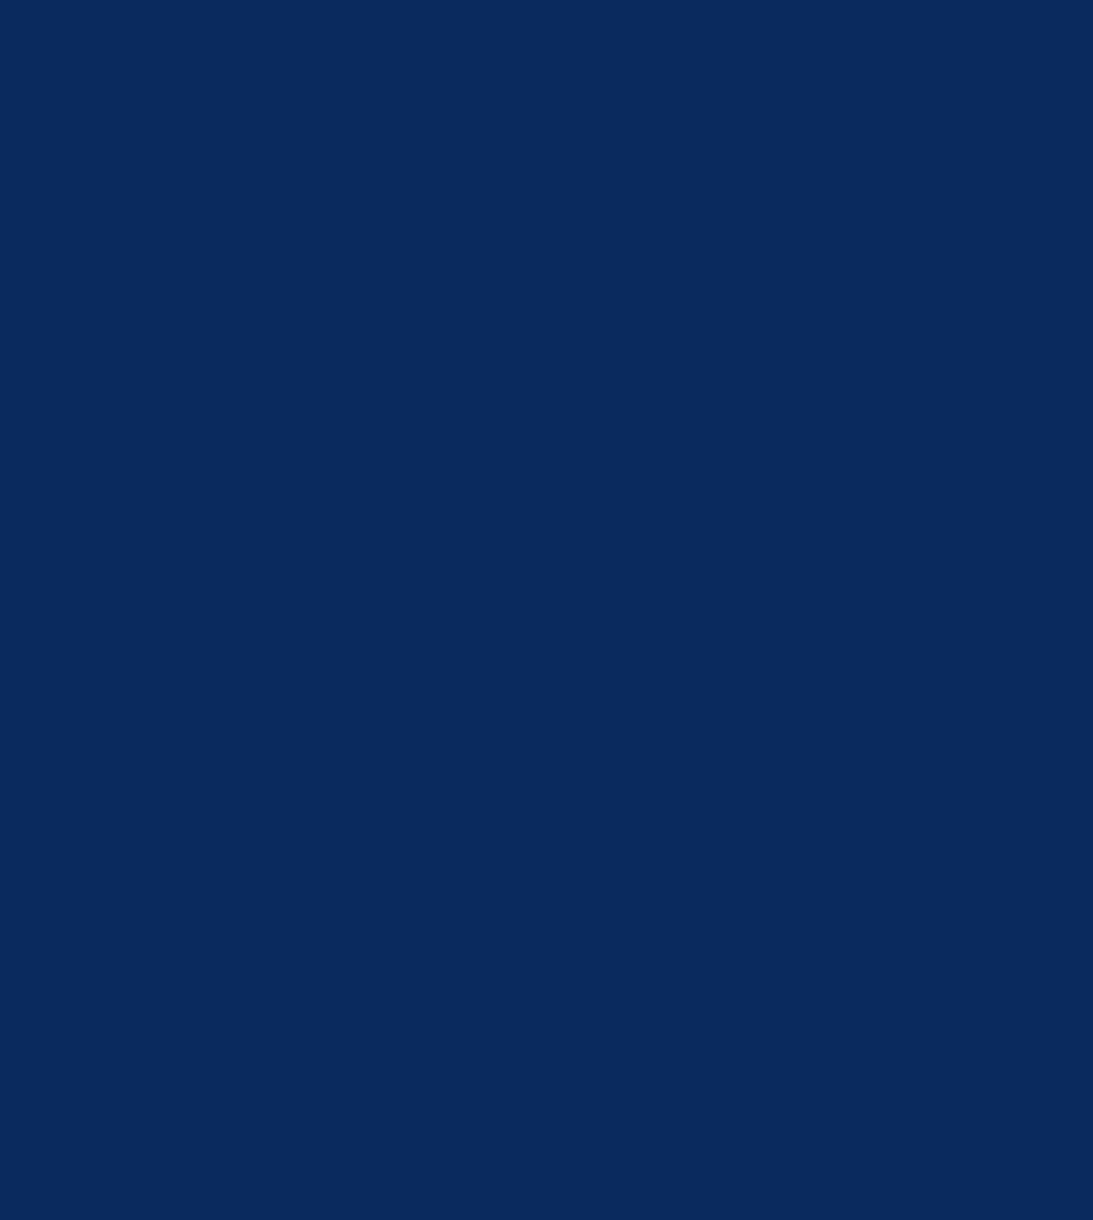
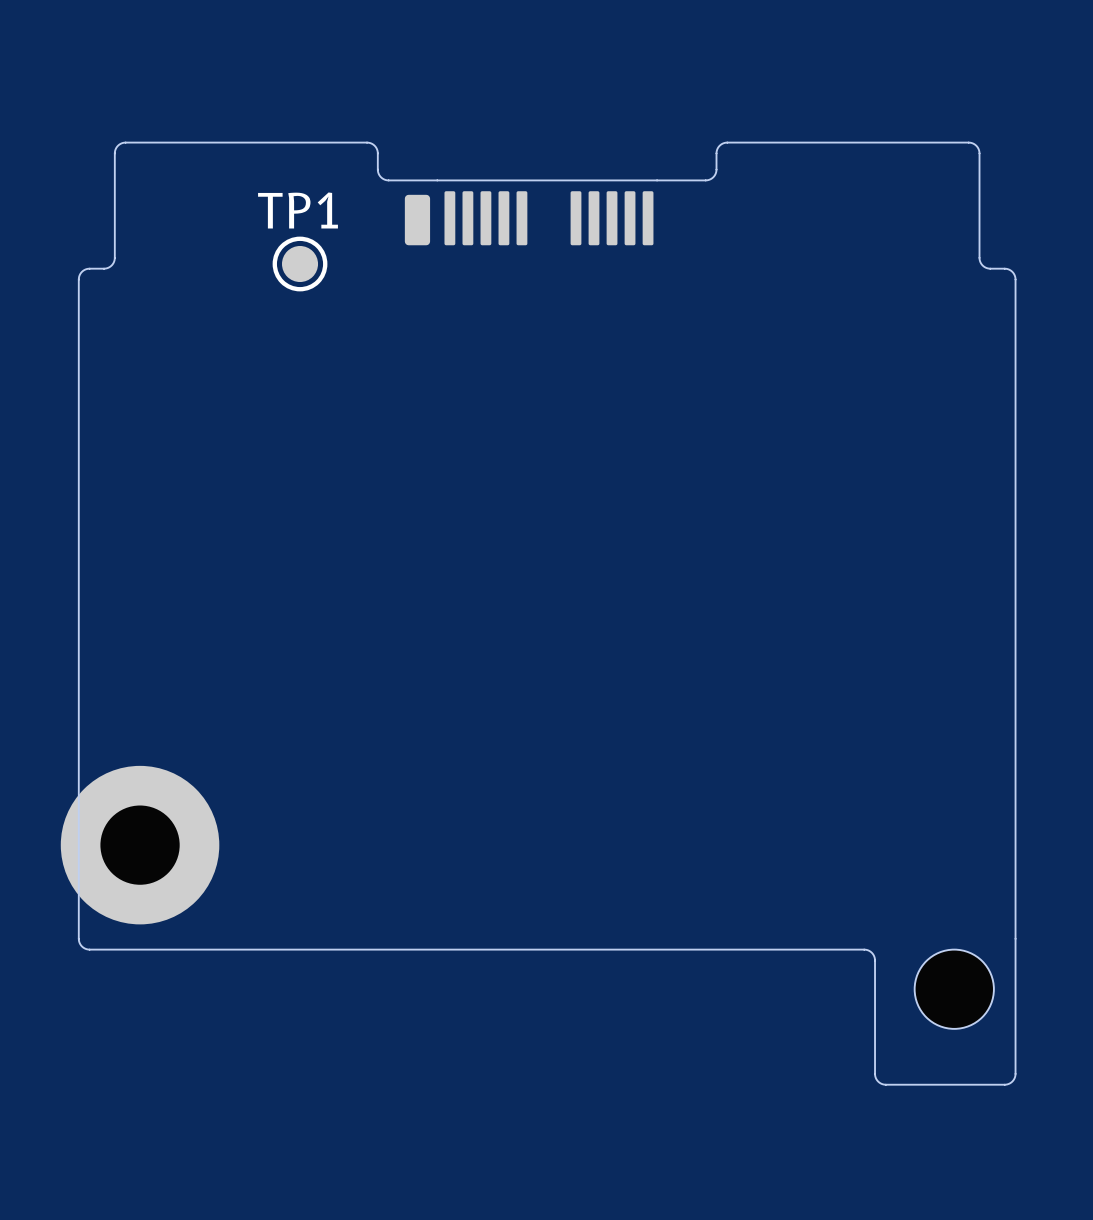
board edge: none -> (968, 142) (725, 142) (720, 144) (716, 150) (715, 175) (705, 180) (388, 180) (379, 175) (377, 150) (374, 145) (368, 142) (125, 142) (117, 145) (114, 153) (114, 260) (106, 268) (84, 270) (78, 279) (78, 938) (81, 946) (89, 949) (865, 949) (871, 952) (874, 959) (875, 1073) (878, 1081) (885, 1084) (1004, 1084) (1012, 1081) (1015, 1073) (1015, 279) (1010, 270) (987, 268) (980, 262) (979, 151) (975, 144) (968, 142)
part: none -> (529, 218)
TP1: none -> (300, 264)
part: none -> (140, 845)
part: none -> (954, 989)

